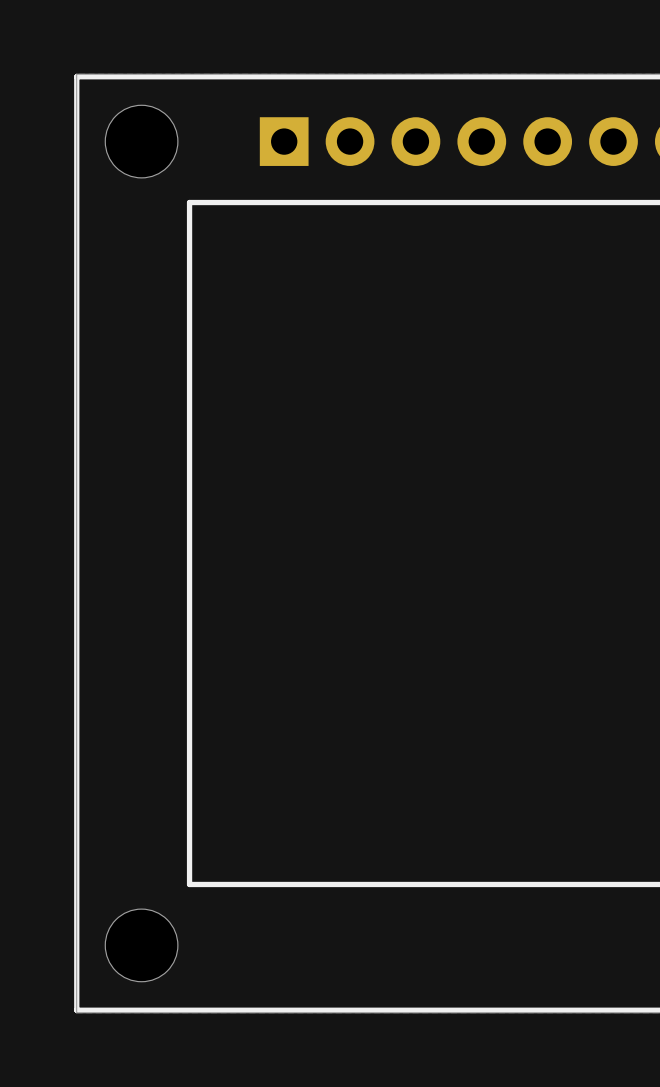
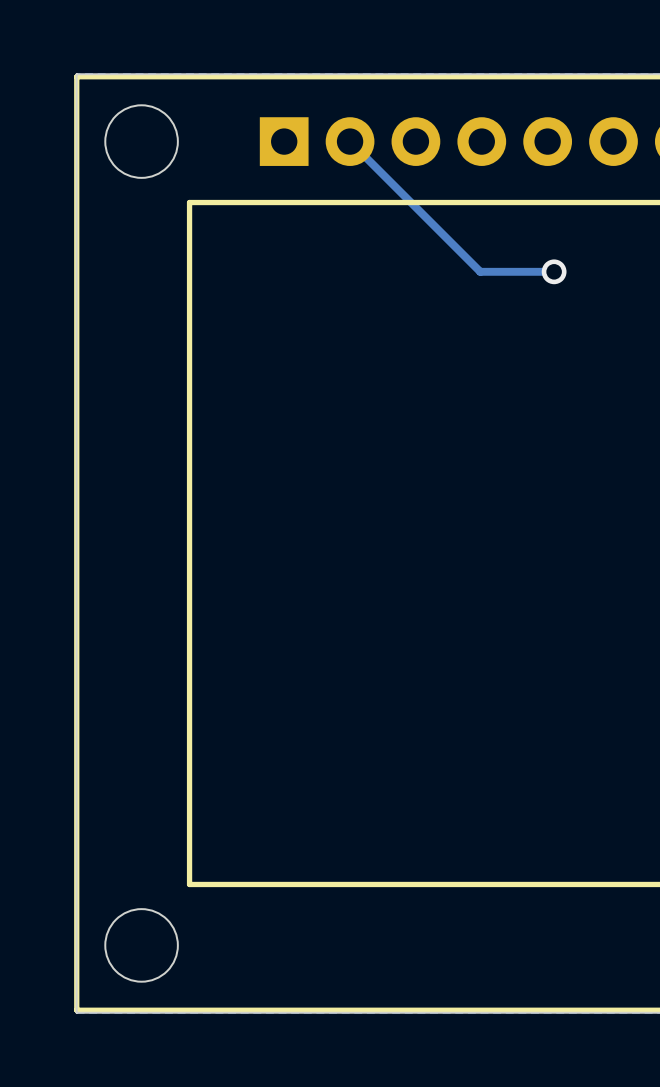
track: none -> (350, 141) (480, 271) (554, 271)
via: none -> (554, 271)

